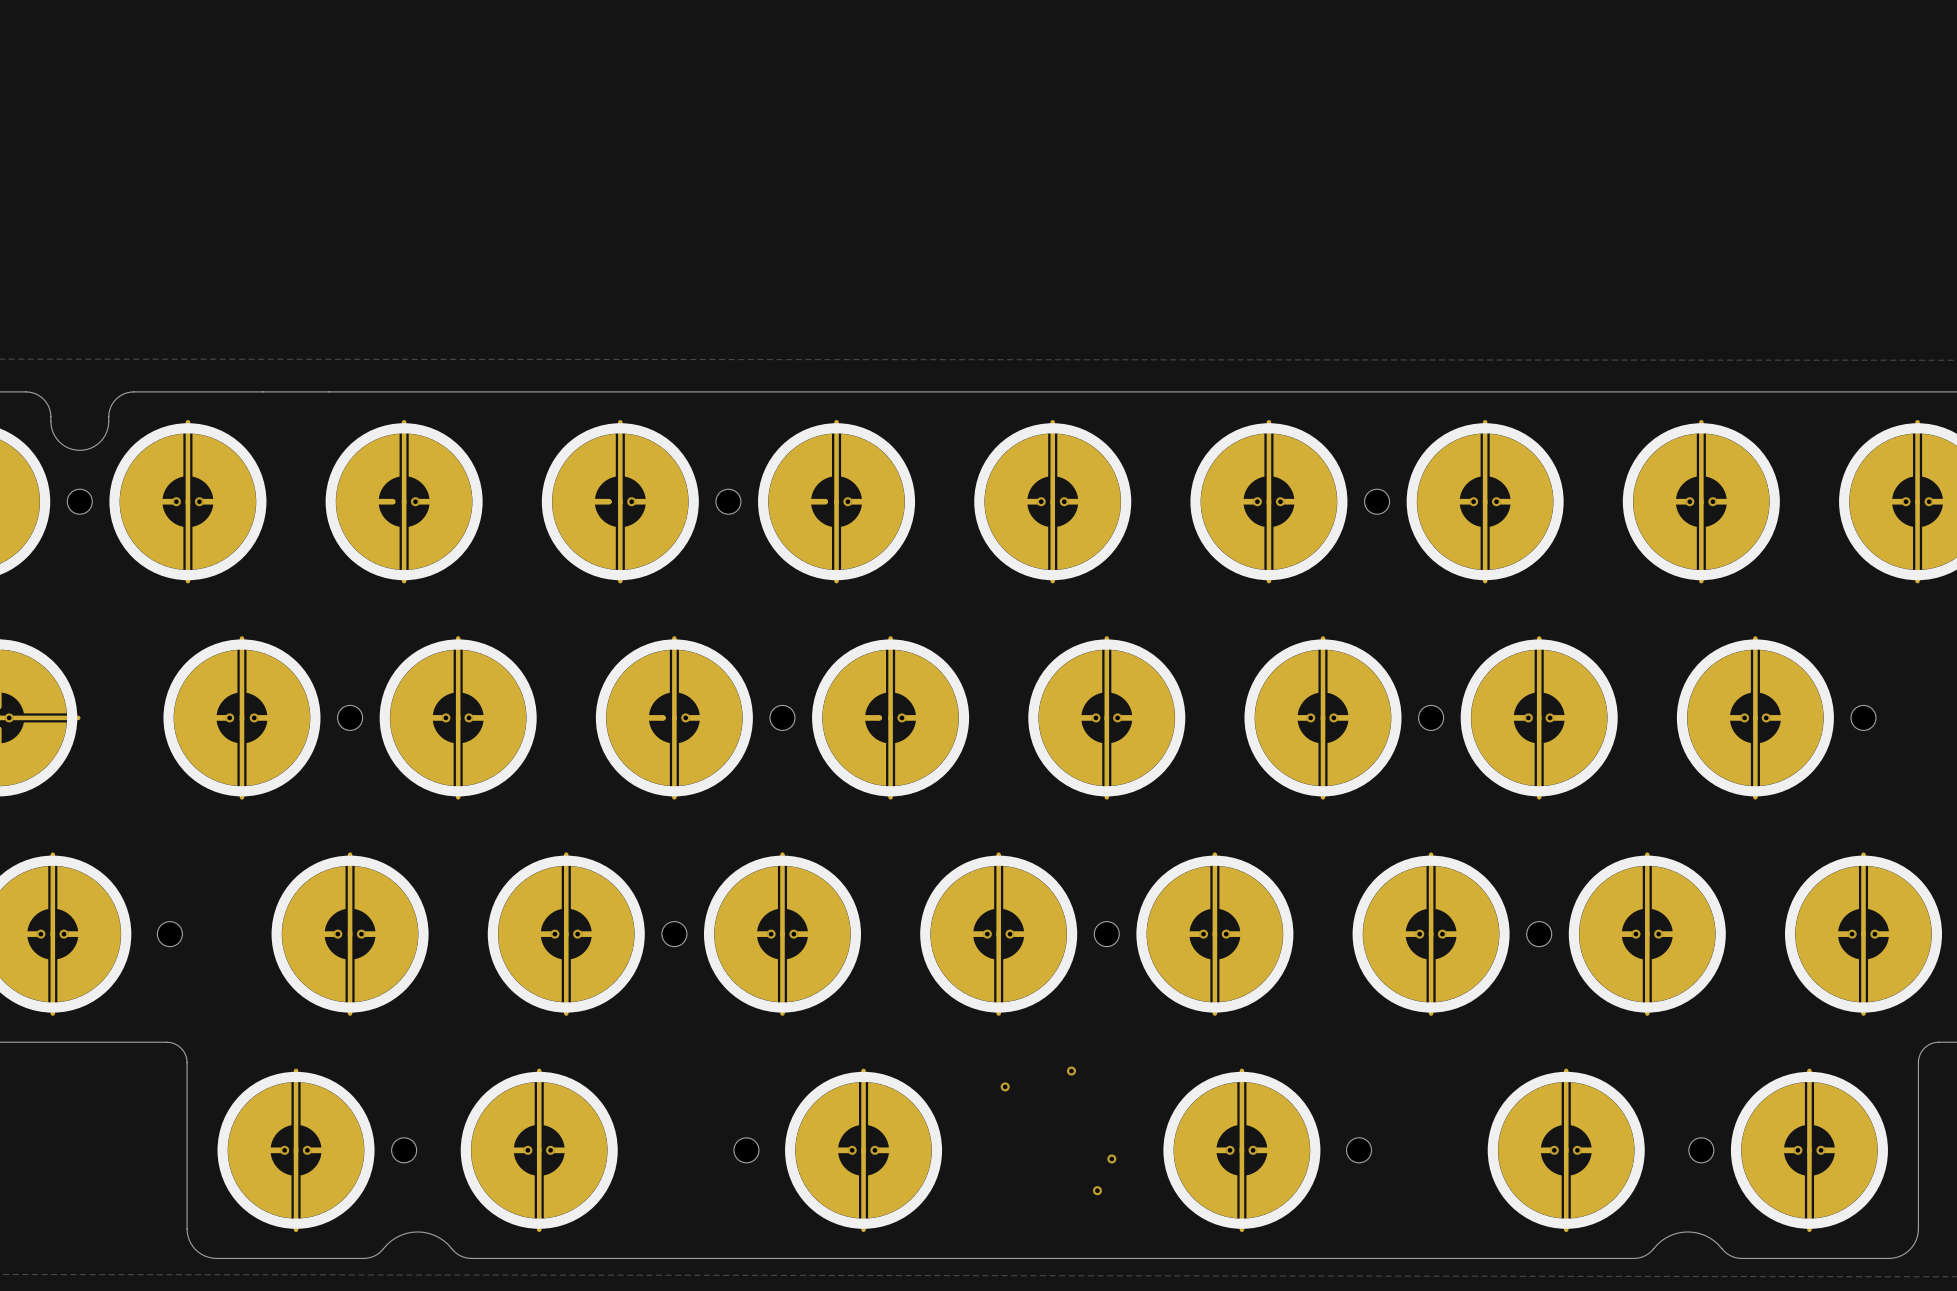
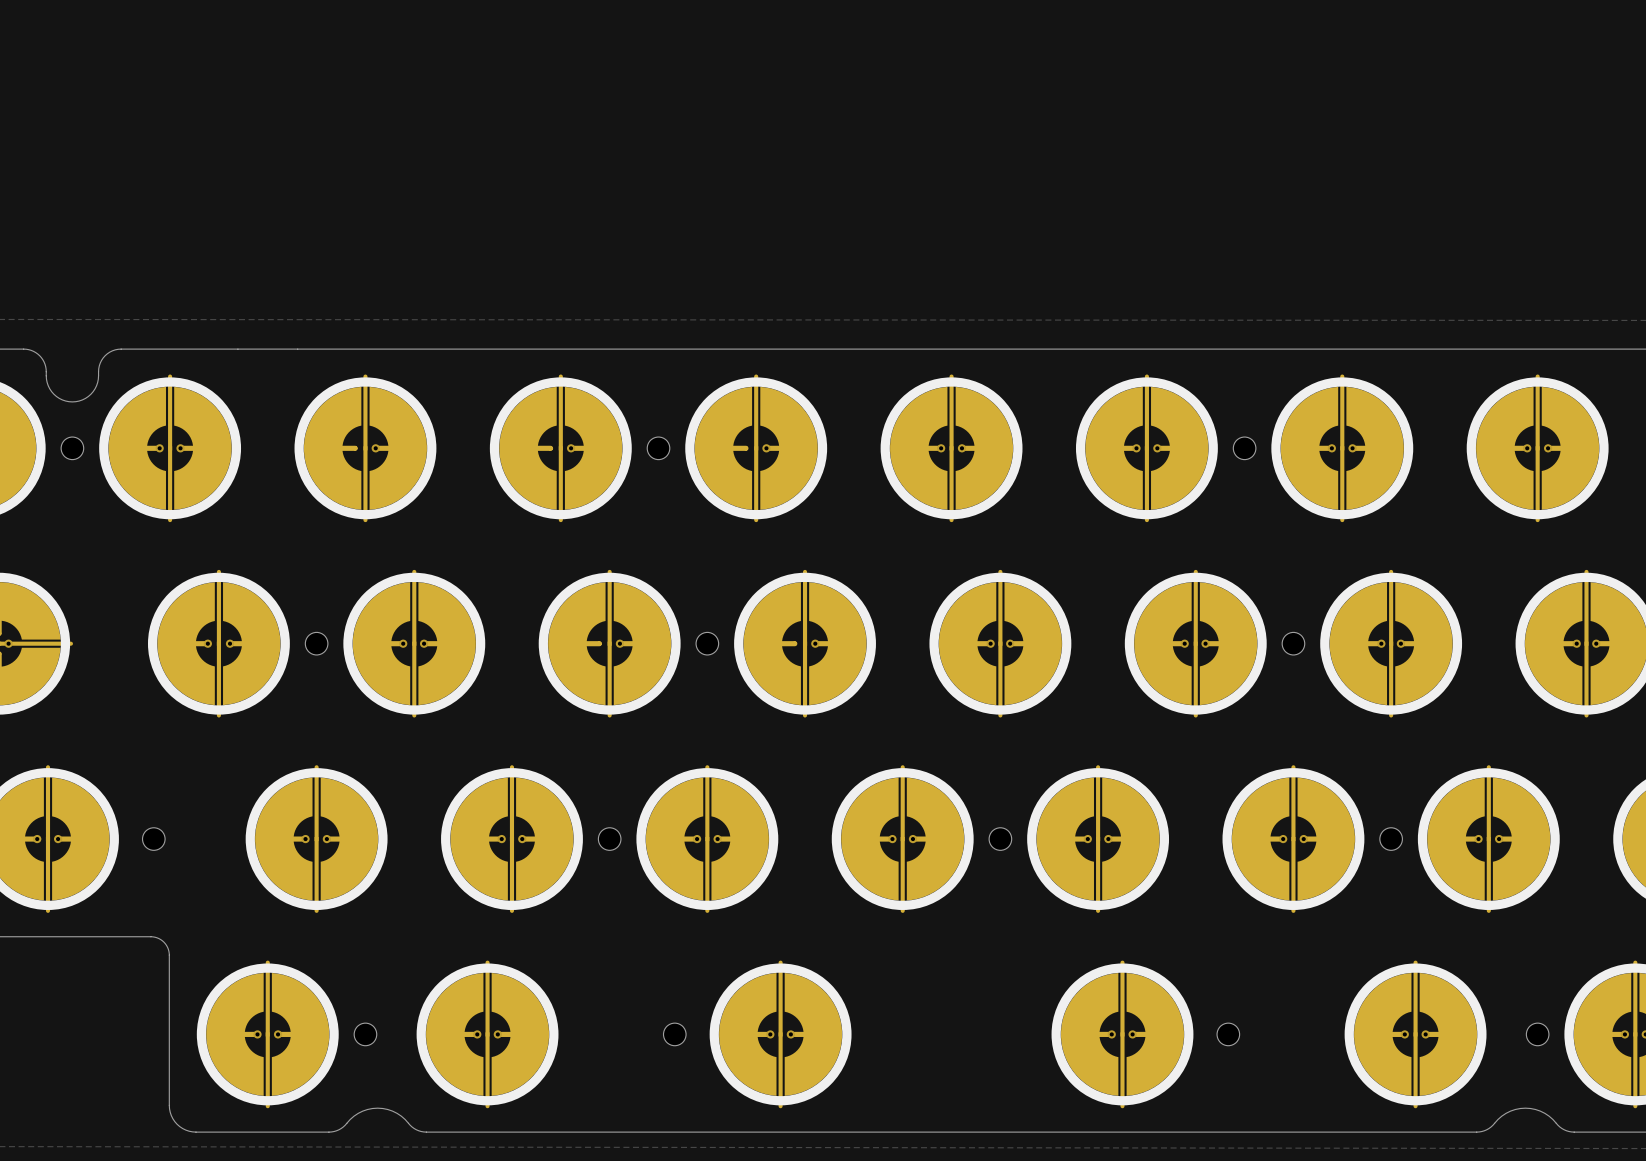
via: (1071, 1071) -> none
via: (1005, 1086) -> none
via: (1111, 1158) -> none
via: (1097, 1190) -> none

